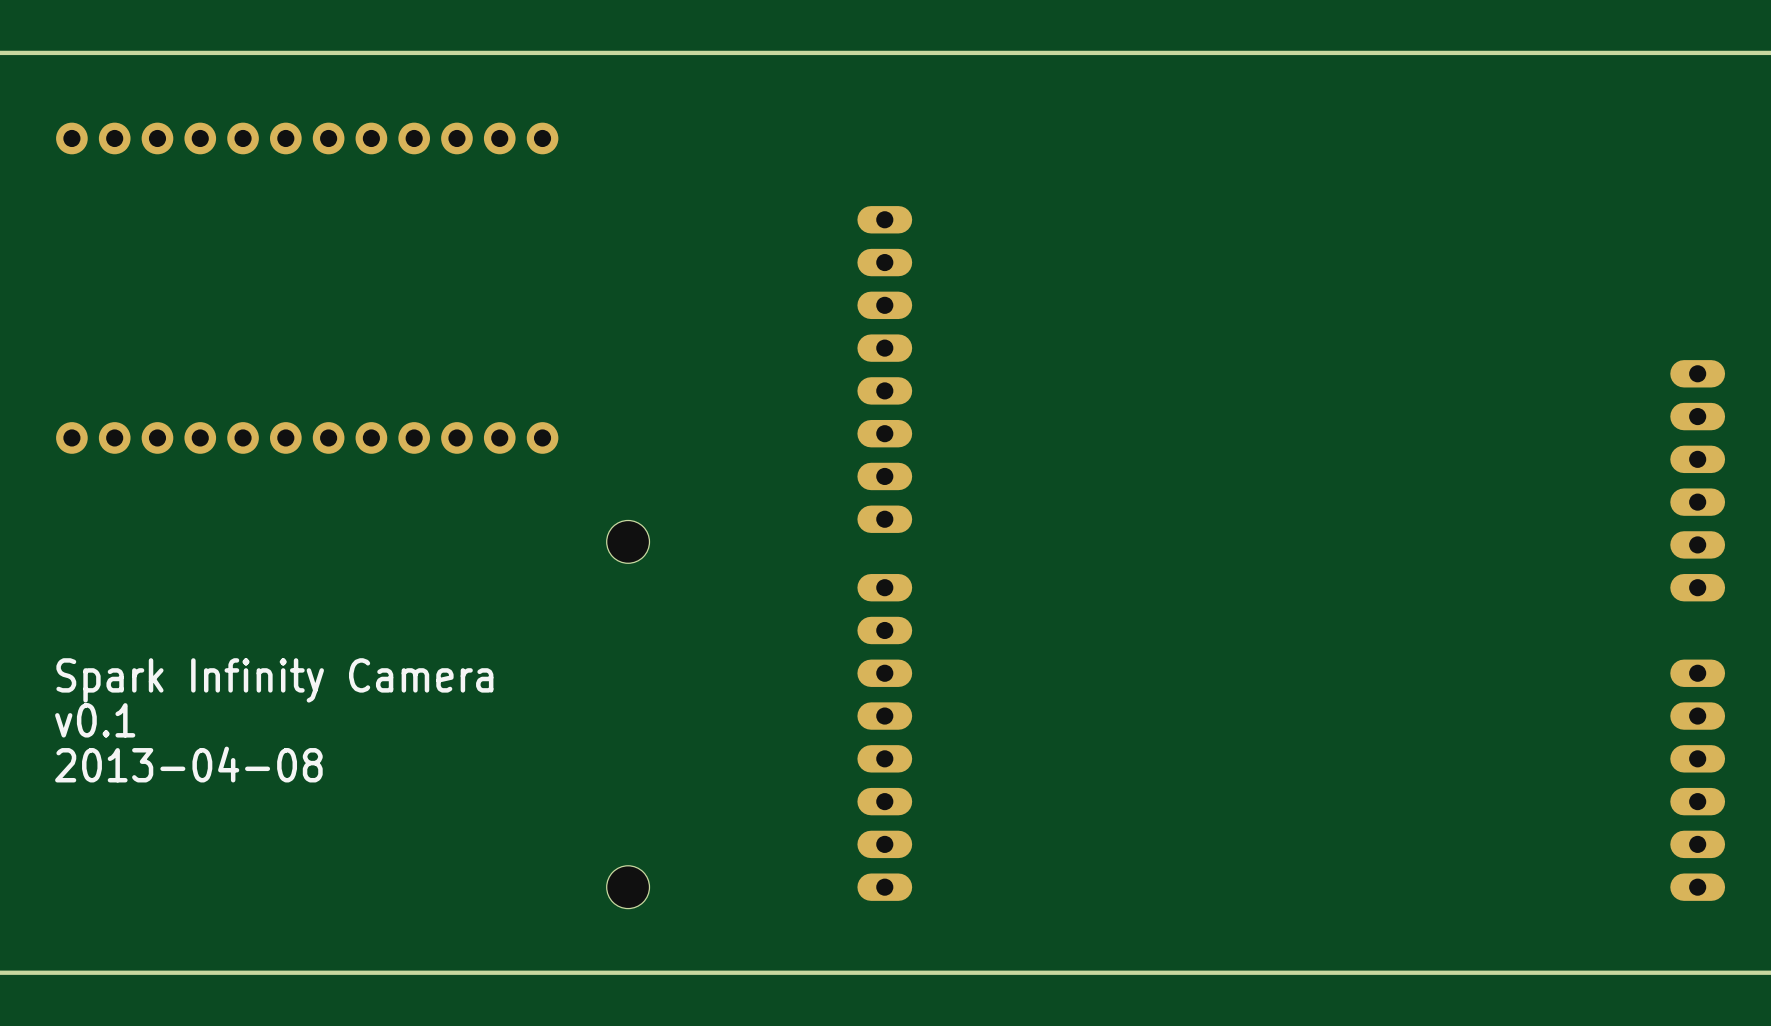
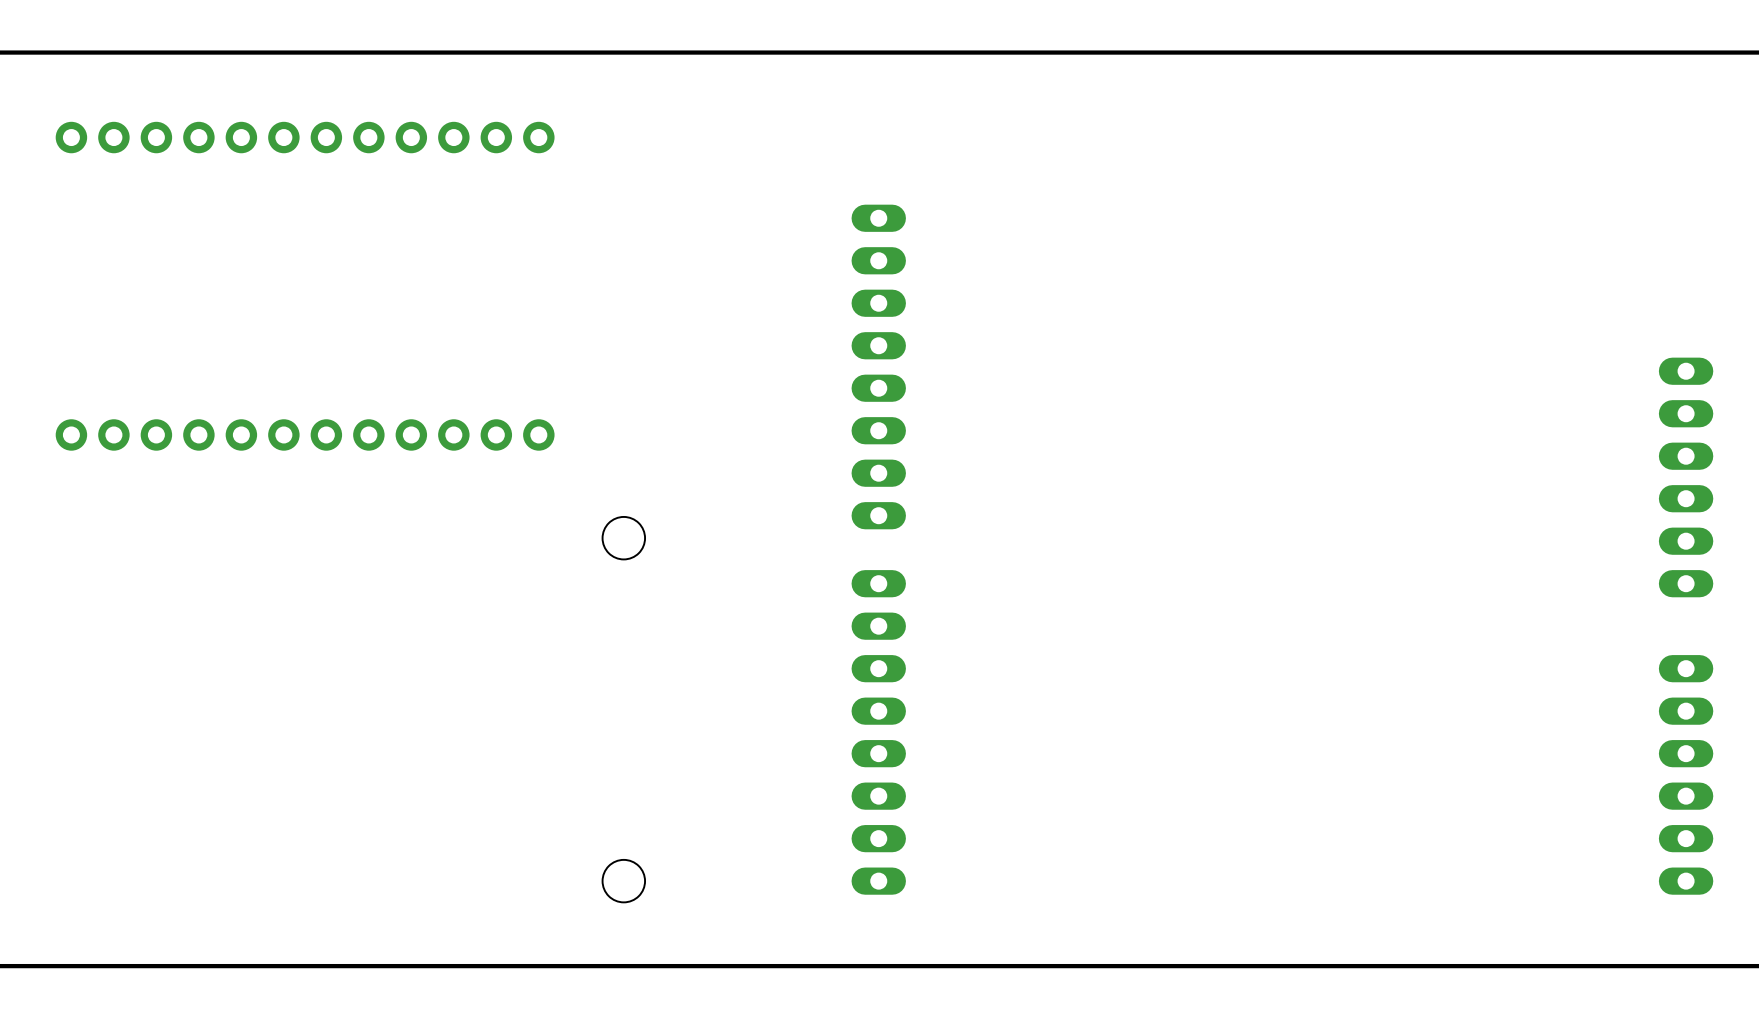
text: Spark Infinity Camera (274, 680) -> none
text: v0.1 (95, 720) -> none
text: 2013-04-08 (188, 764) -> none

